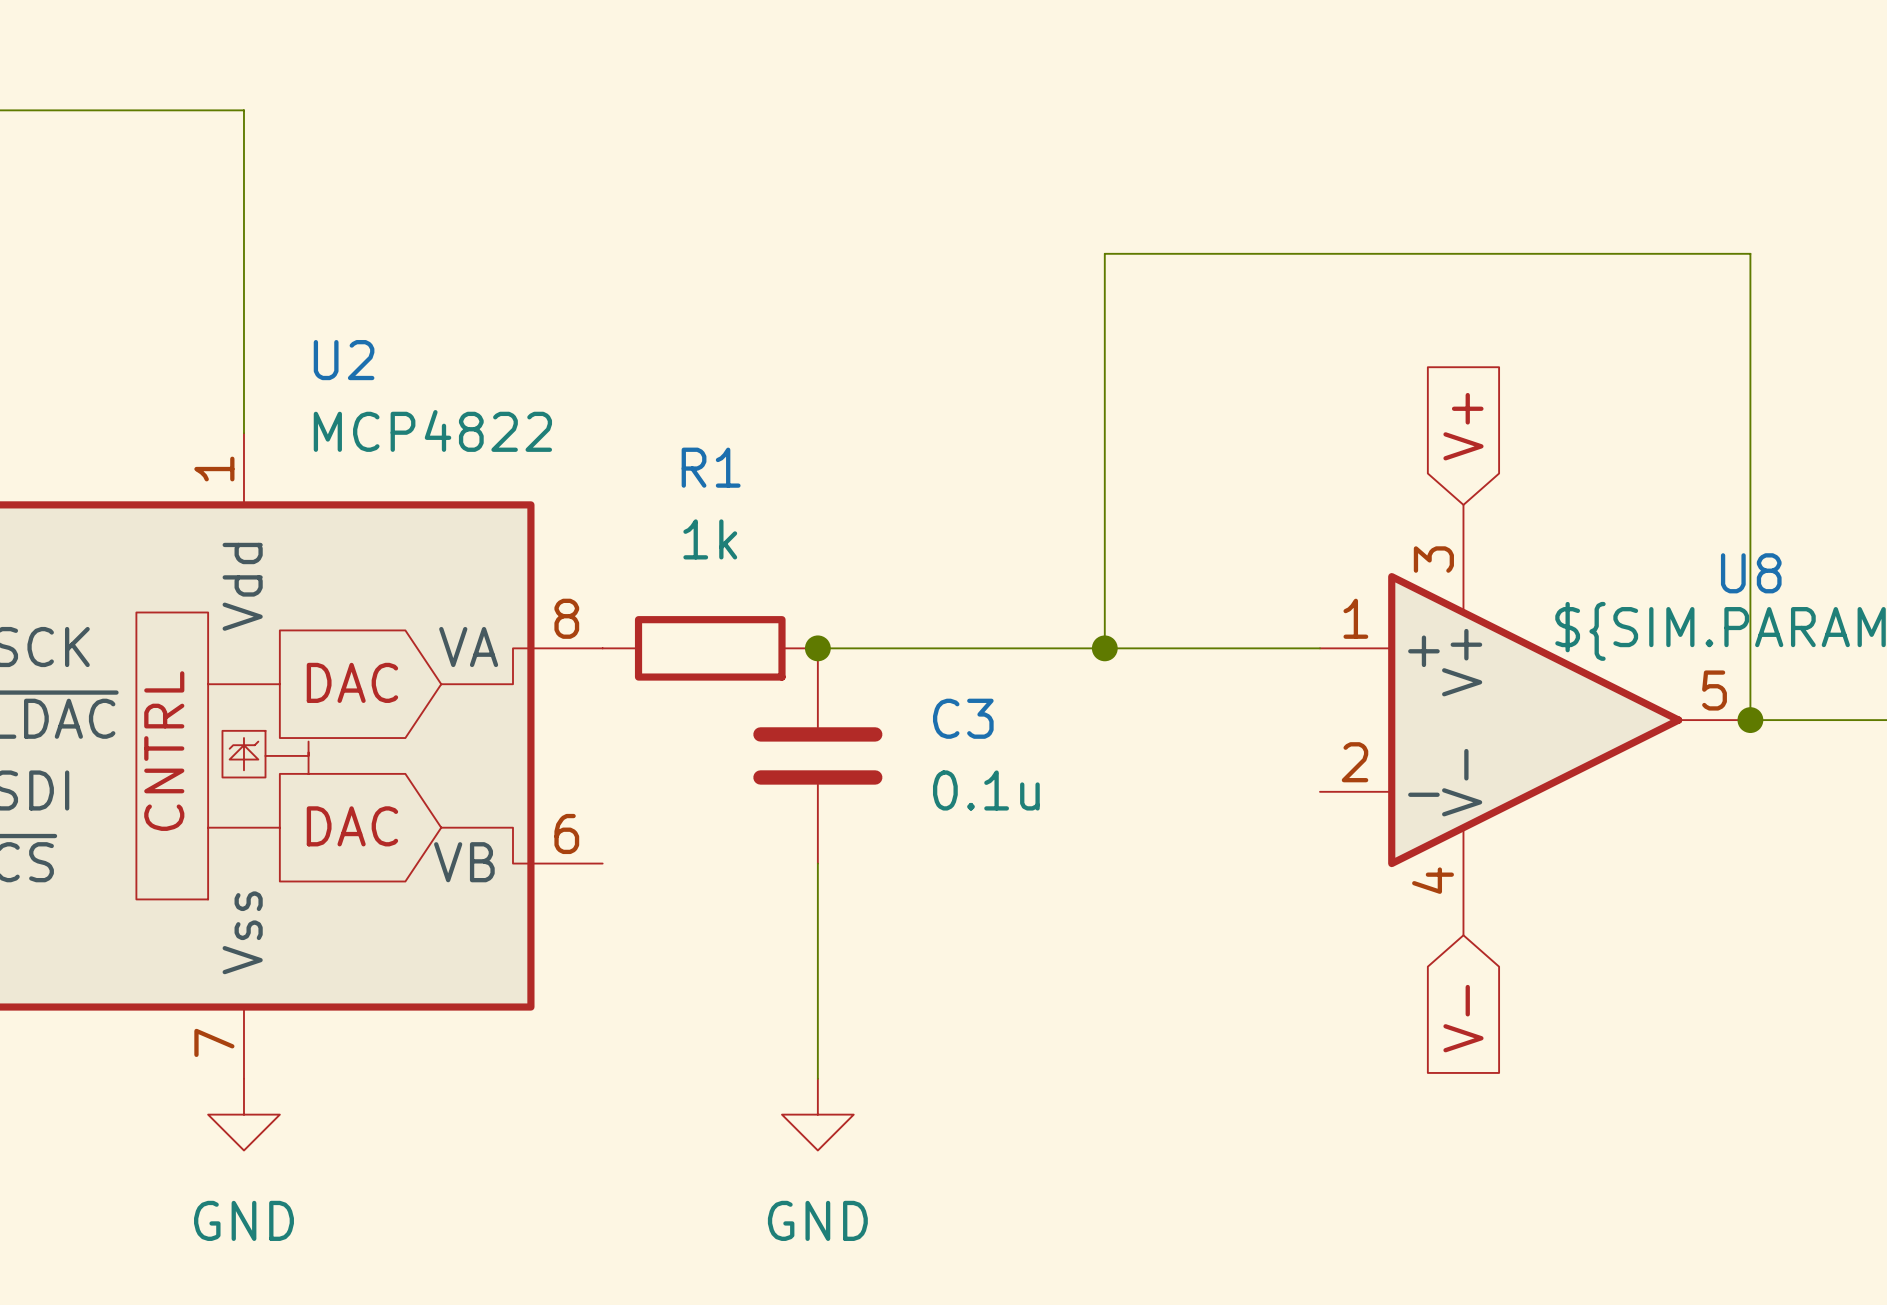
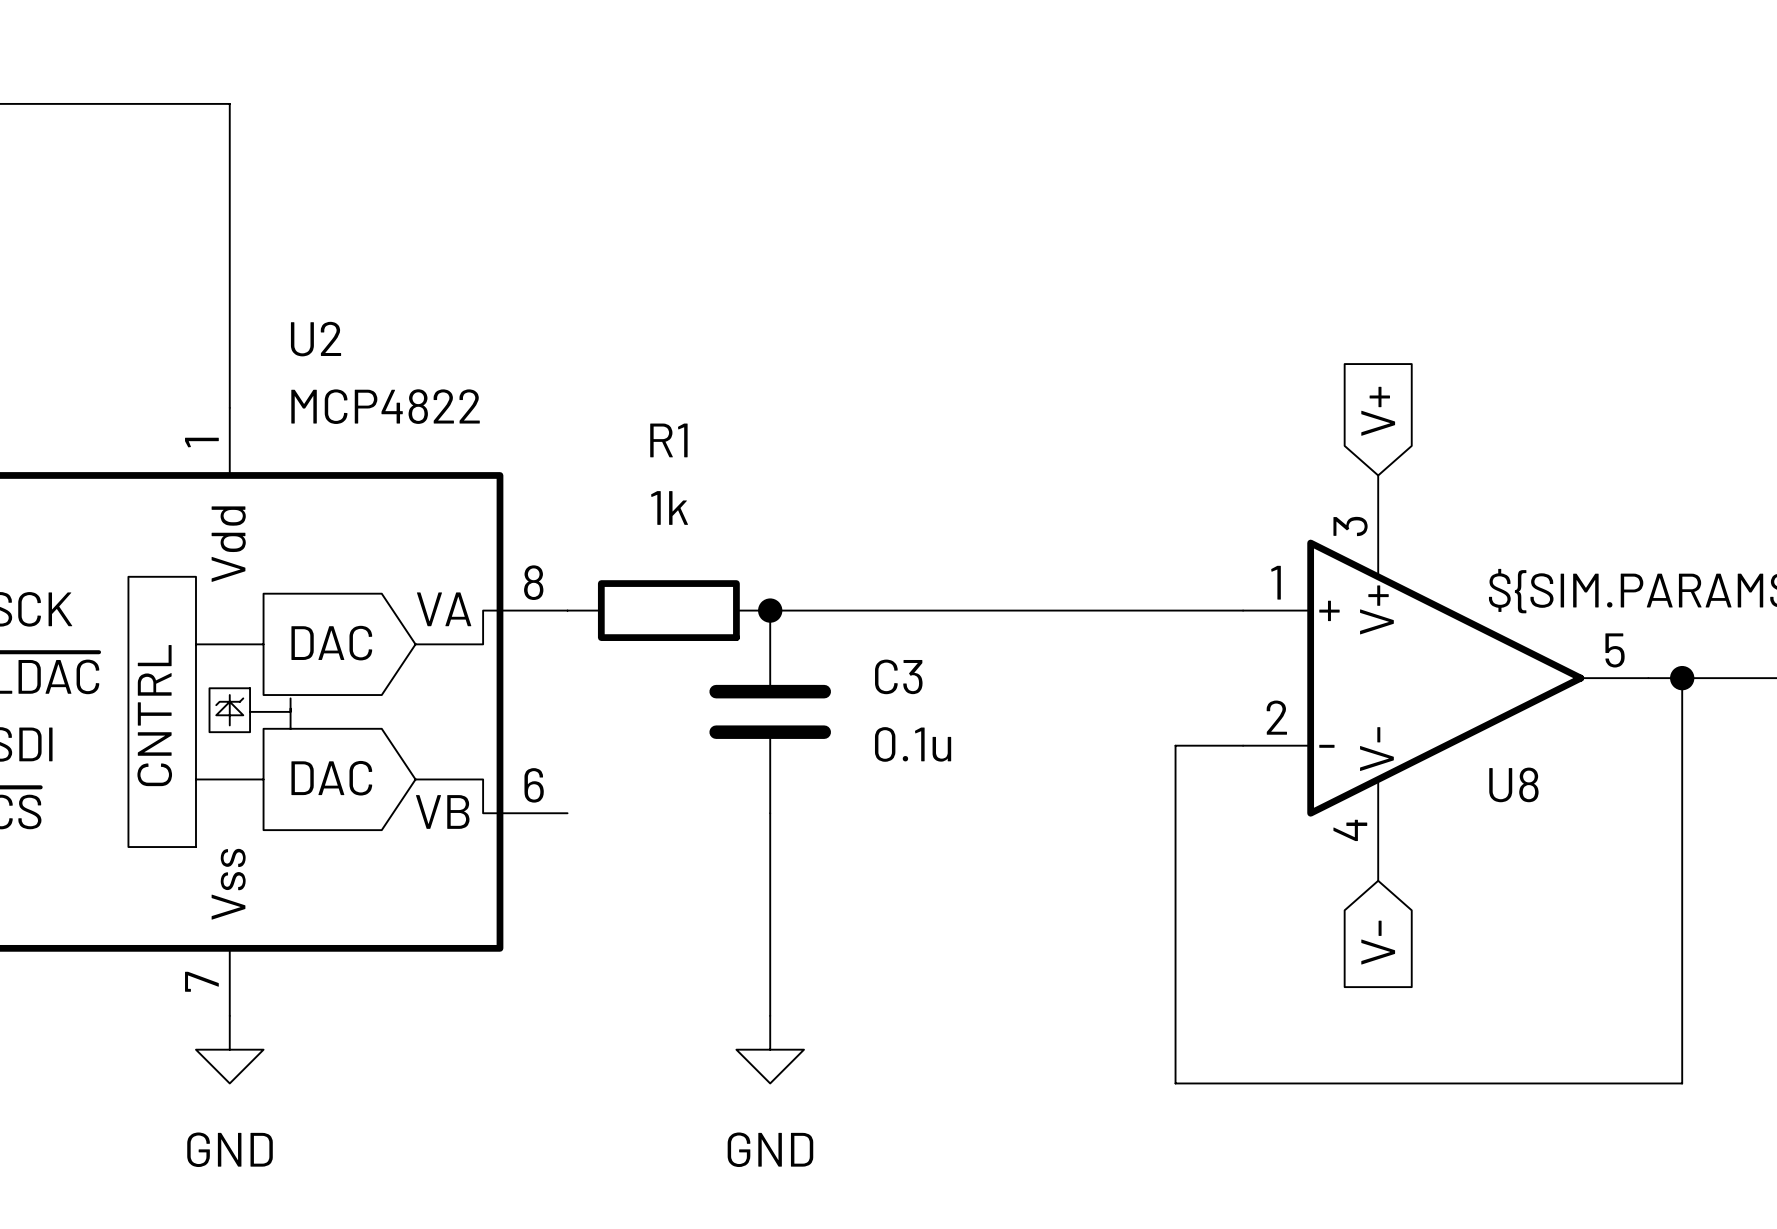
U8 name position: U8 (1751, 573) -> U8 (1513, 784)
wire: (1104, 648) (1104, 253) (1750, 253) (1750, 720) -> none
junction: (1104, 648) -> none
junction position: (1750, 720) -> (1682, 678)
wire: none -> (1682, 678) (1682, 1083) (1175, 1083) (1175, 745) (1243, 745)

